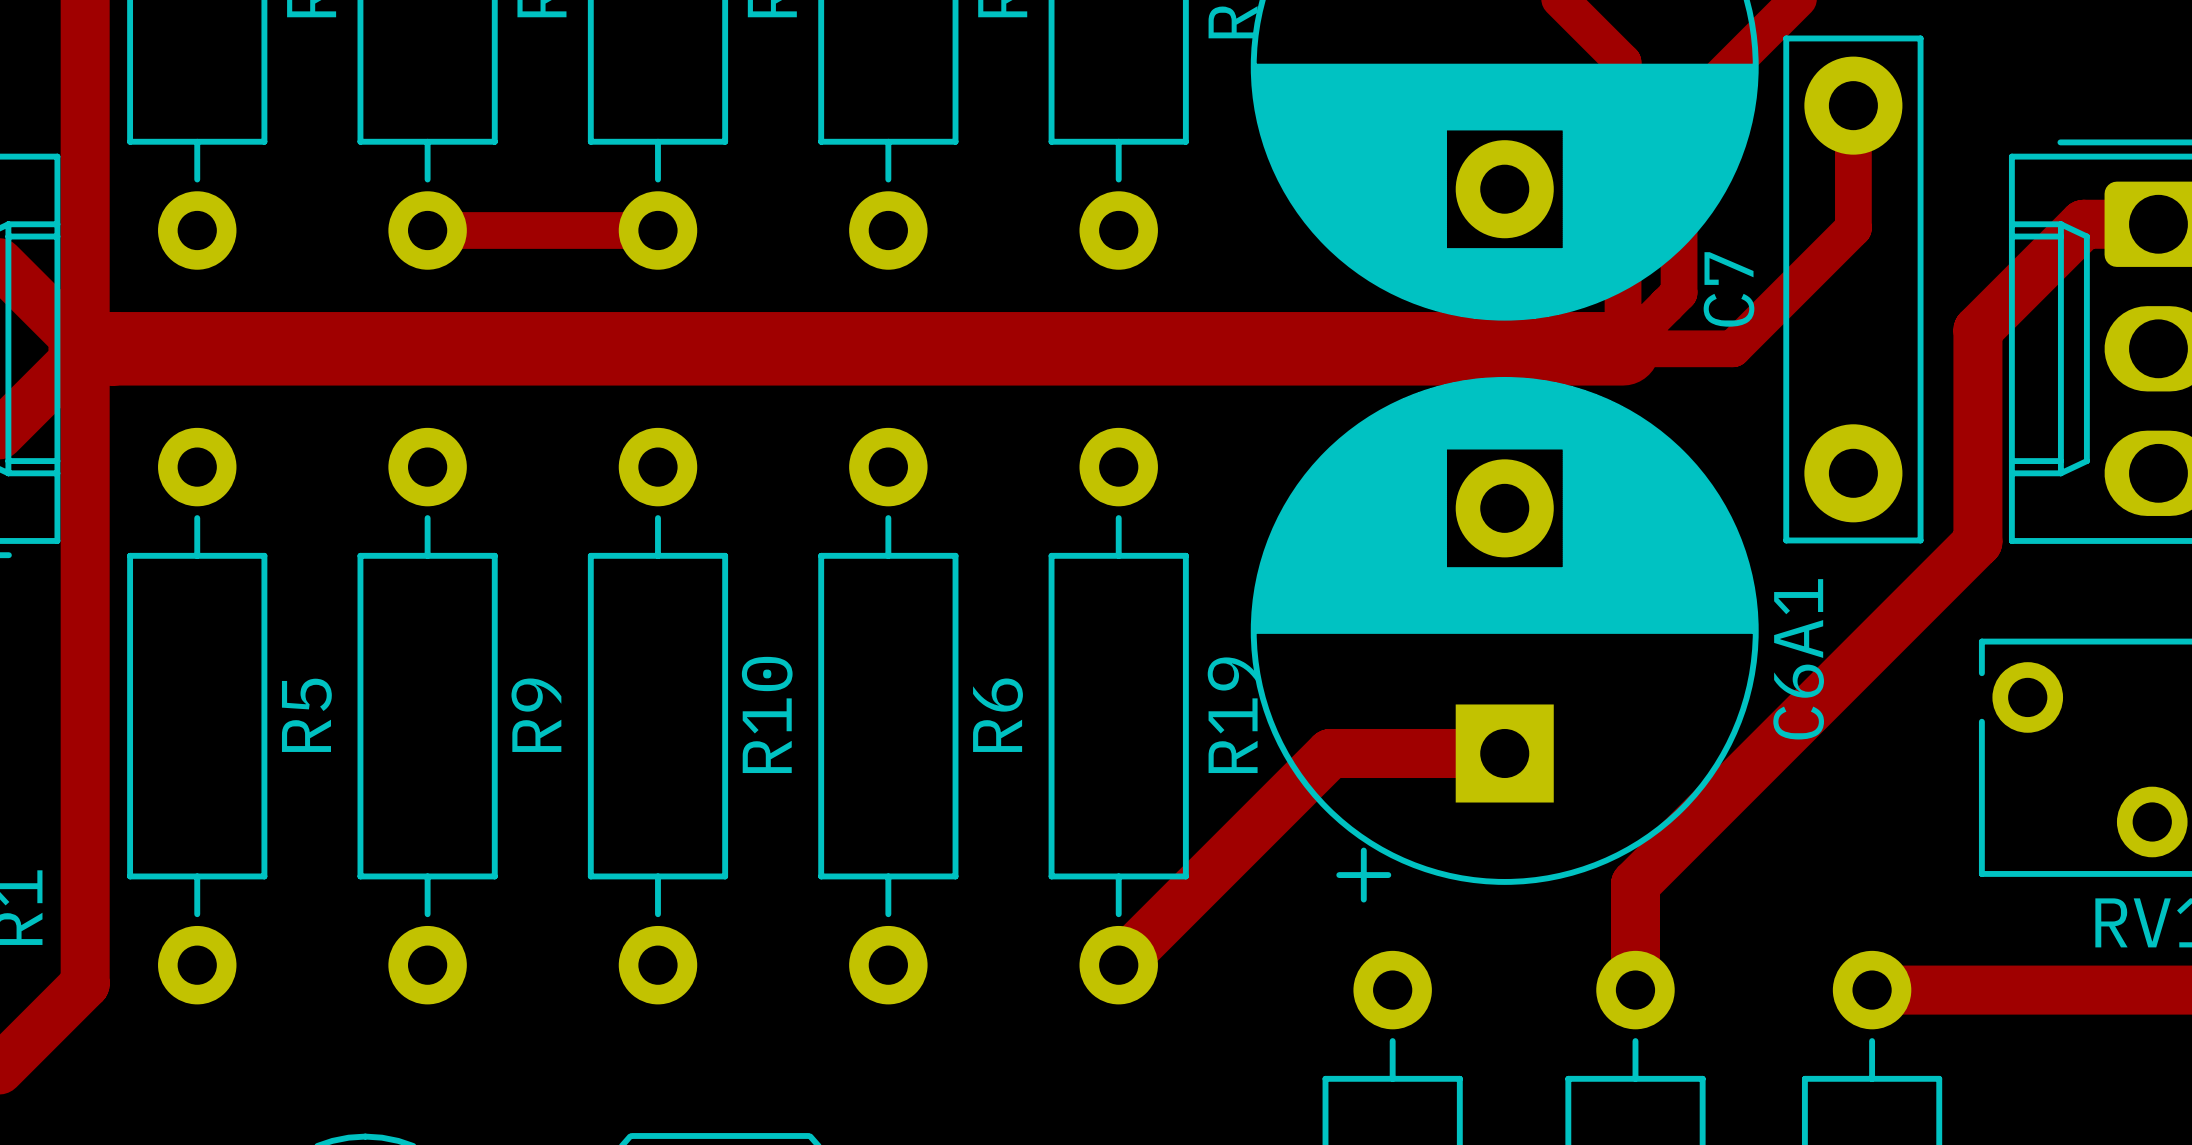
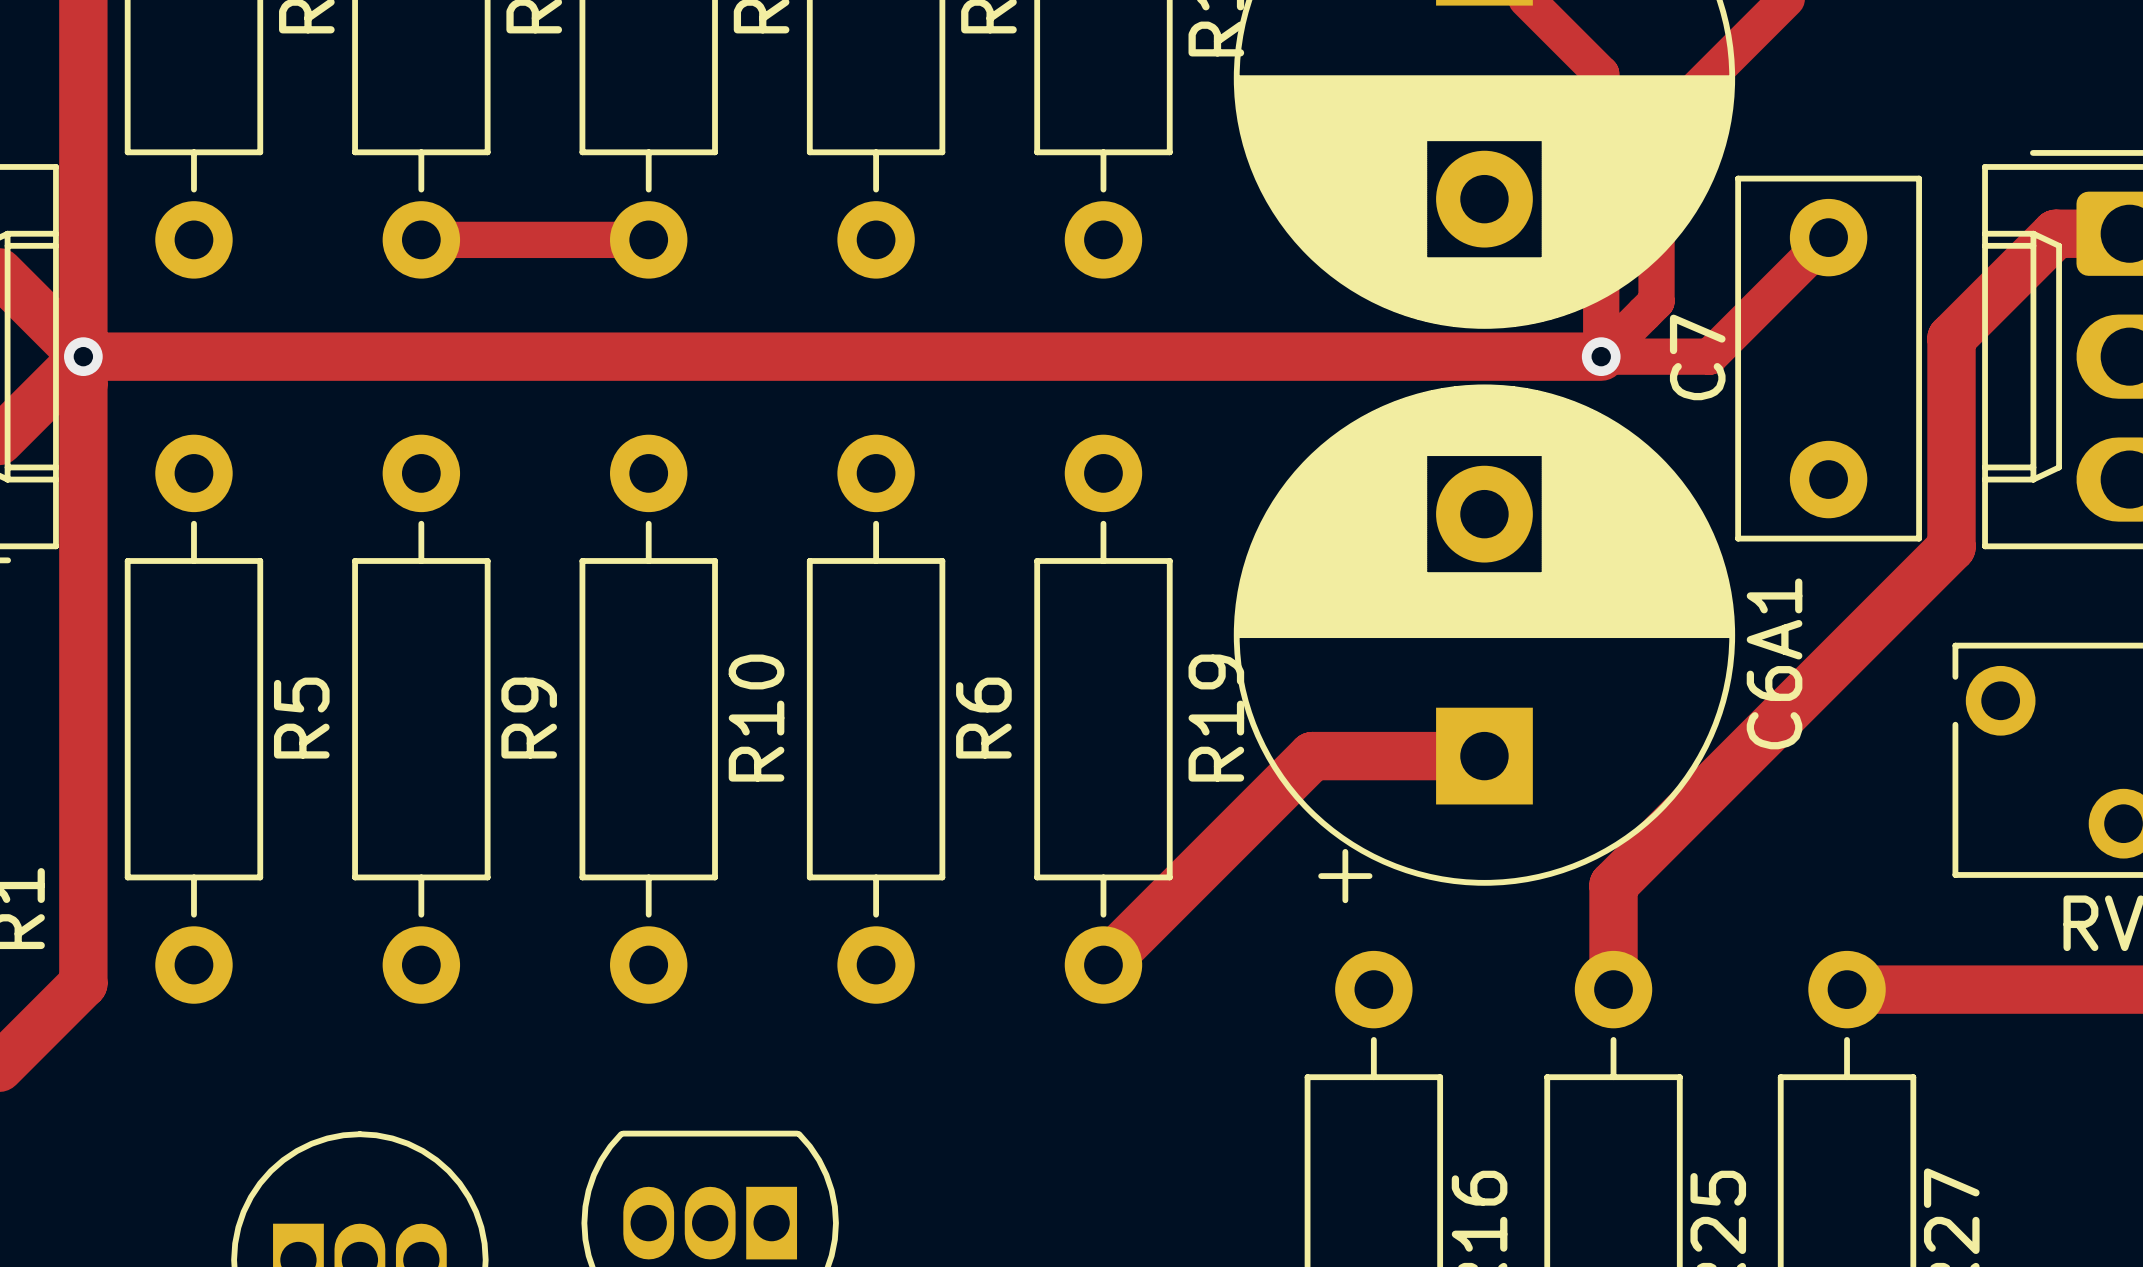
C7 footprint: [1783, 35, 1924, 544] -> [1735, 175, 1922, 542]
track: (1853, 105) (1853, 228) -> none
track width: thick (85, 348) (1623, 348) -> thin (83, 356) (1601, 356)
via: none -> (83, 356)
via: none -> (1601, 356)

